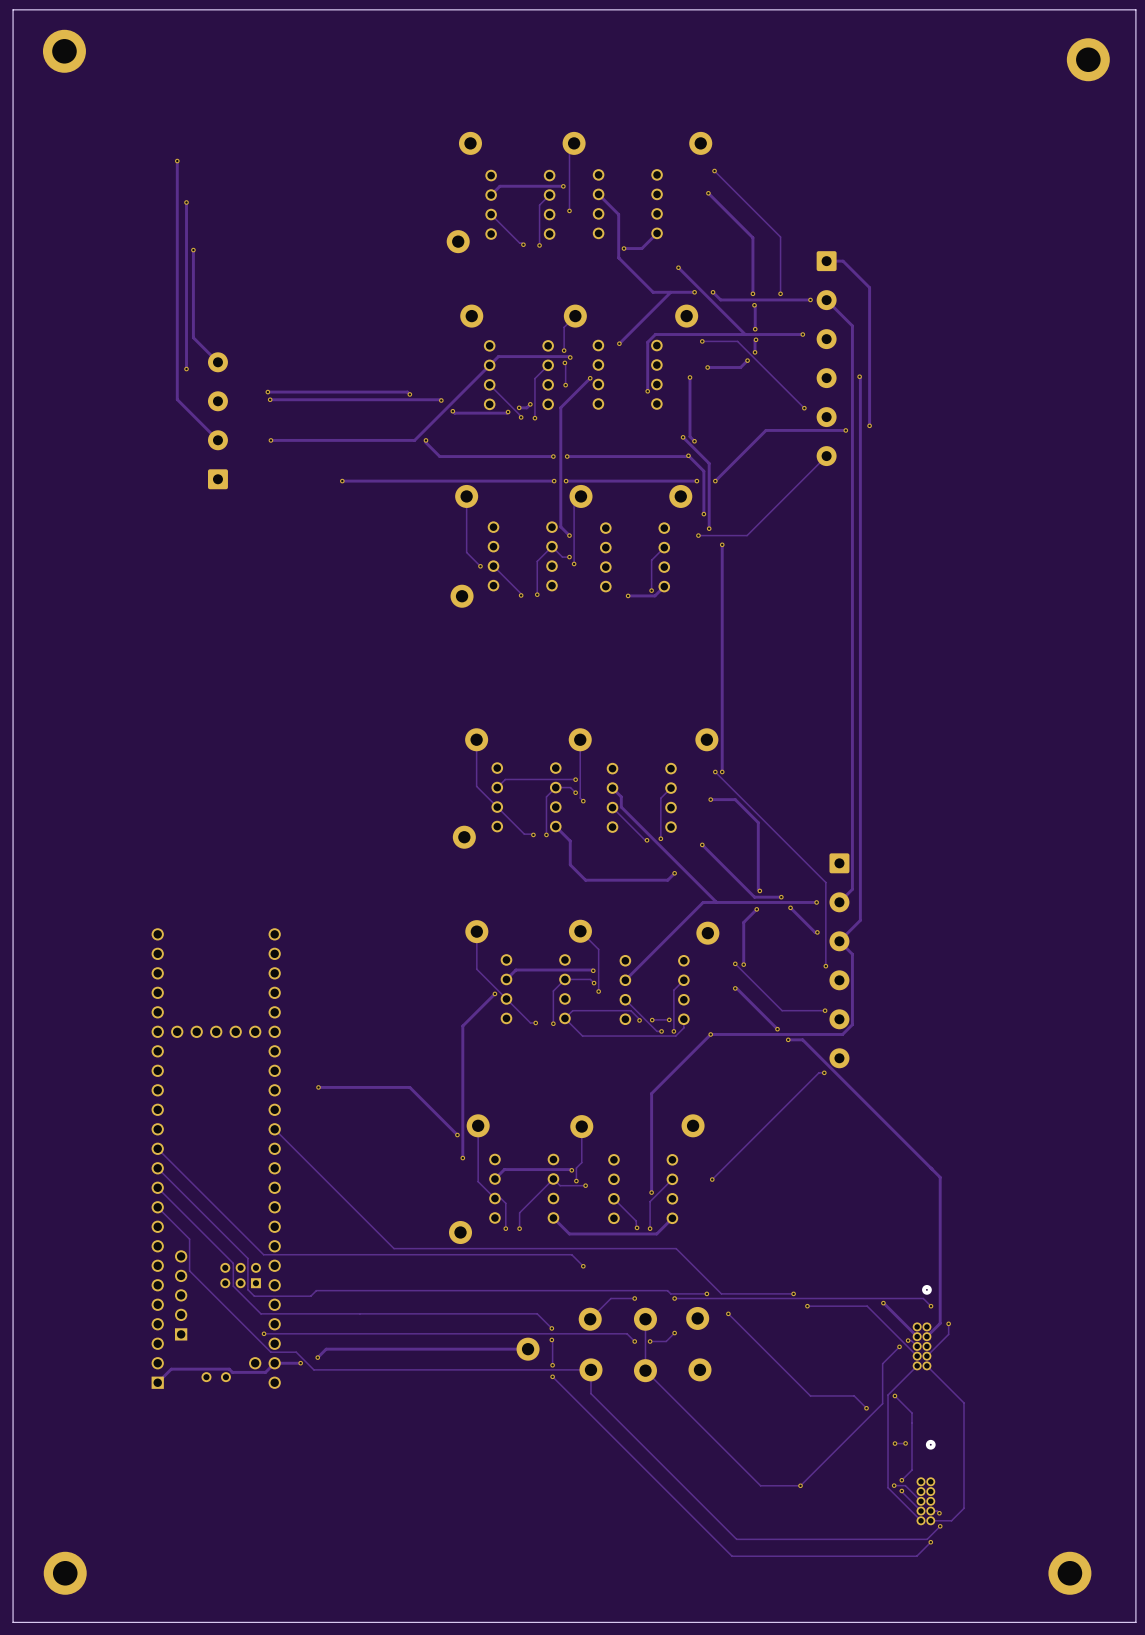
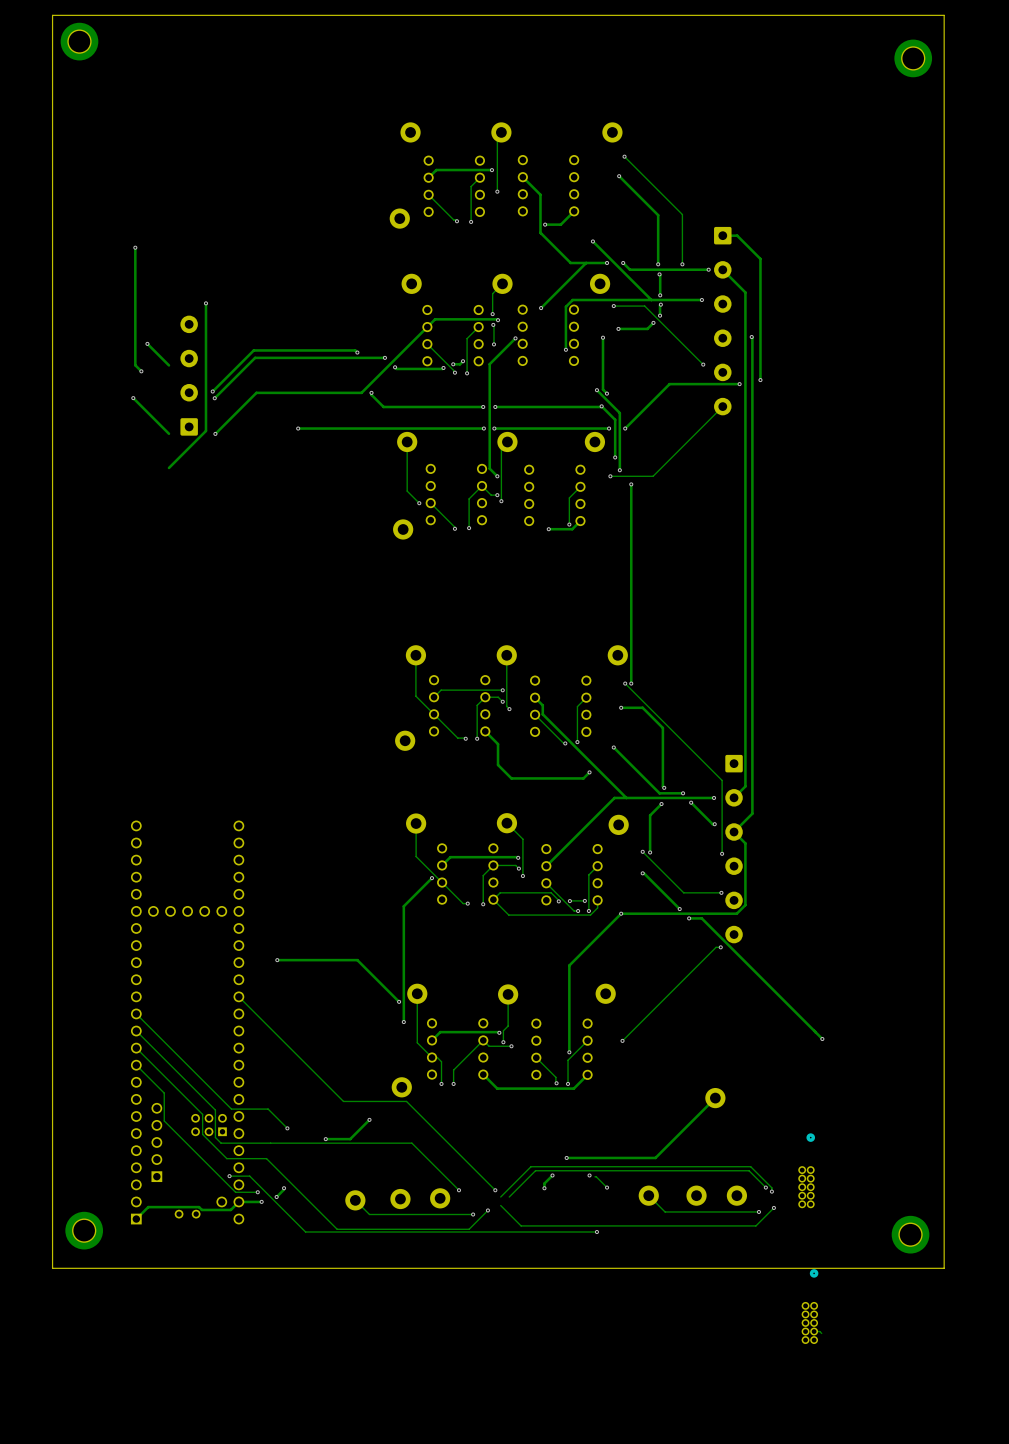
board edge: (1079, 9) (1135, 9) (1135, 1622) (13, 1622) (13, 9) (62, 9) -> (944, 15) (944, 1268) (52, 1268) (52, 15)
part position: (64, 51) -> (79, 41)
part position: (1088, 59) -> (913, 58)
track: (177, 161) (177, 399) (217, 440) -> none
via: (177, 161) -> none
track: (186, 202) (186, 369) -> none
via: (186, 202) -> none
track: (193, 250) (193, 337) (217, 362) -> none
via: (193, 250) -> none
track: none -> (135, 247) (135, 365) (141, 371)
via: none -> (135, 247)
track: none -> (205, 303) (205, 430) (168, 467)
via: none -> (205, 303)
via position: (186, 369) -> (147, 343)
track: none -> (147, 343) (168, 365)
via: (267, 392) -> none
track: (291, 392) (267, 392) -> (253, 350) (212, 391)
via: (270, 399) -> none
track: (440, 399) (270, 399) -> none
track: none -> (384, 357) (255, 357) (214, 398)
via: none -> (141, 371)
via: none -> (212, 391)
via: (270, 440) -> none
track: (294, 440) (270, 440) -> (256, 392) (215, 433)
track: none -> (133, 398) (168, 433)
via: none -> (133, 398)
via: none -> (214, 398)
via: none -> (215, 433)
track: (940, 1177) (940, 1323) (926, 1336) -> none
via: none -> (822, 1039)
track: none -> (715, 1098) (655, 1157) (566, 1157)
part: none -> (715, 1098)
track: (465, 1248) (676, 1248) (721, 1293) (793, 1293) -> (406, 1101) (495, 1190)
track: (263, 1254) (571, 1254) (583, 1266) -> (229, 1106) (231, 1109) (268, 1109) (287, 1128)
via: (583, 1266) -> none
track: none -> (369, 1119) (350, 1139) (325, 1139)
via: none -> (369, 1119)
via: none -> (287, 1128)
via: none -> (325, 1139)
track: (706, 1293) (670, 1293) (667, 1290) (316, 1290) (310, 1296) -> (459, 1190) (411, 1143) (270, 1143)
via: (706, 1293) -> none
via: (793, 1293) -> none
track: (634, 1298) (610, 1298) (590, 1319) -> none
via: (634, 1298) -> none
track: (674, 1298) (923, 1298) (931, 1306) -> none
via: (674, 1298) -> none
track: (883, 1303) (917, 1336) -> none
via: (883, 1303) -> none
track: (807, 1306) (867, 1306) (917, 1356) -> none
via: (807, 1306) -> none
via: (931, 1306) -> none
track: (306, 1313) (537, 1313) (551, 1328) -> (266, 1158) (337, 1229) (469, 1229) (487, 1210)
via: none -> (566, 1157)
track: (728, 1313) (810, 1395) (854, 1395) (866, 1408) -> none
via: (728, 1313) -> none
part: (697, 1318) -> none
part: (590, 1319) -> none
track: (645, 1319) (645, 1370) (760, 1485) (800, 1485) (882, 1403) (882, 1363) (899, 1346) -> none
part: (645, 1319) -> none
track: (948, 1323) (948, 1334) (926, 1356) -> none
via: (948, 1323) -> none
via: (551, 1328) -> none
track: (287, 1333) (627, 1333) (634, 1341) -> (249, 1176) (305, 1231) (596, 1231)
track: none -> (552, 1175) (544, 1183) (544, 1188)
via: none -> (552, 1175)
track: (674, 1333) (666, 1341) (650, 1341) -> none
track: none -> (594, 1176) (607, 1187)
track: (551, 1339) (552, 1365) -> none
via: (551, 1339) -> none
track: (908, 1340) (911, 1340) (917, 1346) -> none
via: (908, 1340) -> none
via: (634, 1341) -> none
via: (650, 1341) -> none
via: none -> (607, 1187)
track: none -> (765, 1187) (749, 1170) (535, 1170) (509, 1197)
via: none -> (765, 1187)
via: (899, 1346) -> none
via: none -> (284, 1188)
via: none -> (544, 1188)
via: none -> (459, 1190)
track: (528, 1349) (326, 1349) -> none
part position: (528, 1349) -> (440, 1198)
via: none -> (495, 1190)
track: none -> (771, 1191) (771, 1187) (750, 1166) (531, 1166) (500, 1197)
via: none -> (771, 1191)
track: (296, 1352) (313, 1369) (590, 1369) (590, 1393) (736, 1539) (927, 1539) (940, 1526) -> none
via: none -> (257, 1192)
track: none -> (648, 1195) (665, 1211) (758, 1211)
part: none -> (648, 1195)
part: none -> (696, 1195)
part: none -> (736, 1195)
part: none -> (400, 1199)
track: none -> (355, 1200) (369, 1214) (473, 1214)
part: none -> (355, 1200)
via: (552, 1365) -> none
track: (917, 1365) (888, 1395) (888, 1487) (921, 1520) -> none
track: (926, 1365) (964, 1402) (964, 1508) (951, 1520) (930, 1520) -> none
track: none -> (500, 1205) (521, 1225) (755, 1225) (773, 1207)
part: (590, 1369) -> none
part: (699, 1369) -> none
part: (645, 1370) -> none
via: none -> (773, 1207)
via: none -> (487, 1210)
via: none -> (758, 1211)
track: (552, 1376) (732, 1556) (916, 1556) (930, 1542) -> none
via: (552, 1376) -> none
via: none -> (473, 1214)
track: (894, 1395) (911, 1413) (911, 1470) (901, 1480) -> none
via: (894, 1395) -> none
via: none -> (596, 1231)
via: (866, 1408) -> none
via: (894, 1443) -> none
track: (905, 1443) (894, 1443) -> none
via: (905, 1443) -> none
via: (901, 1480) -> none
via: (800, 1485) -> none
track: (894, 1485) (905, 1485) (921, 1501) -> none
via: (894, 1485) -> none
track: (901, 1491) (921, 1511) -> none
via: (901, 1491) -> none
via: (939, 1513) -> none
via: (940, 1526) -> none
via: (930, 1542) -> none
part position: (65, 1573) -> (84, 1230)
part position: (1069, 1573) -> (910, 1234)

